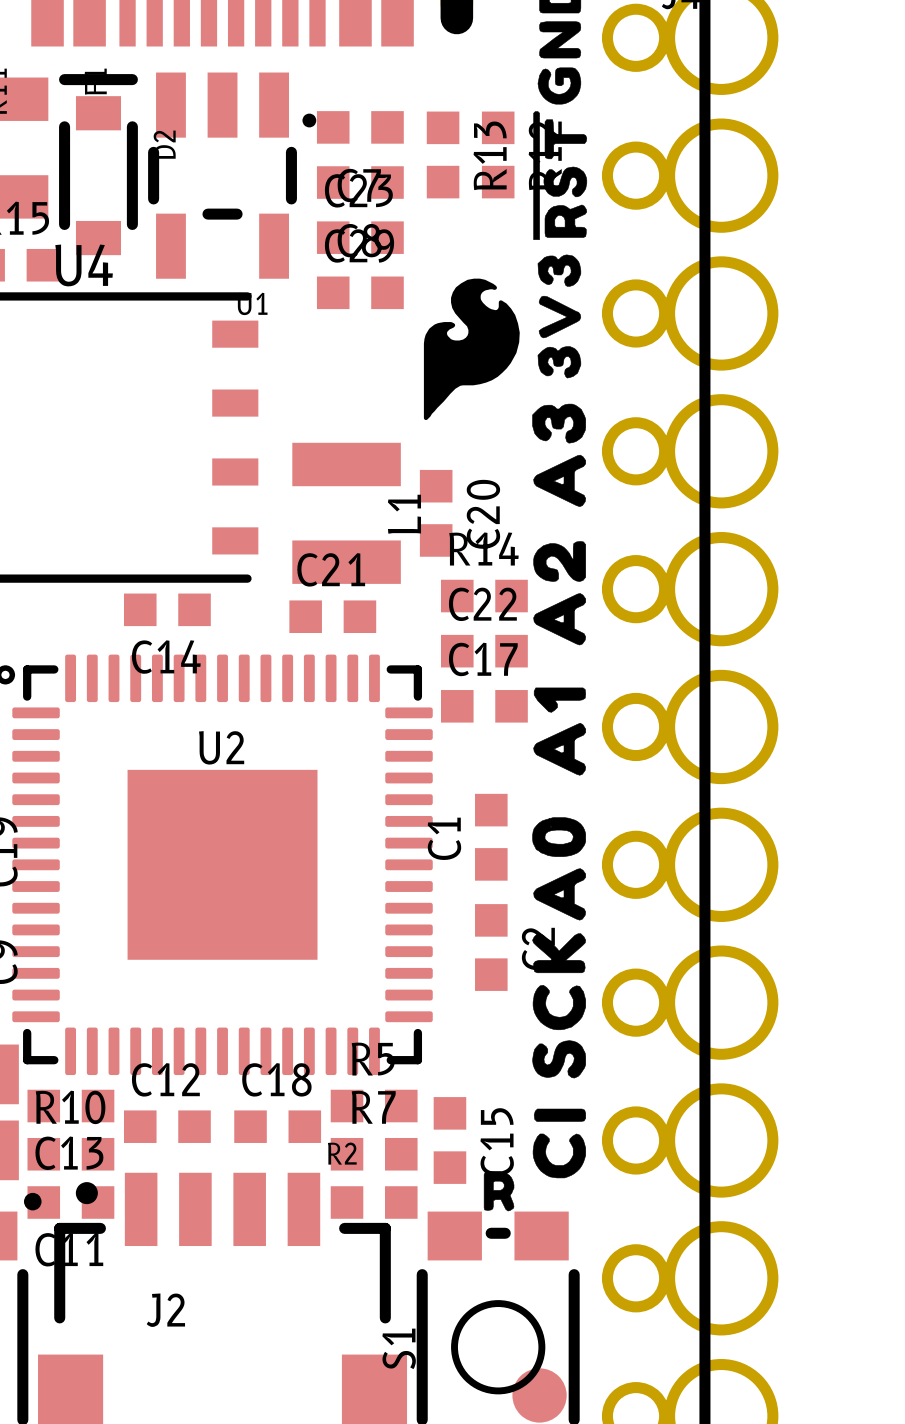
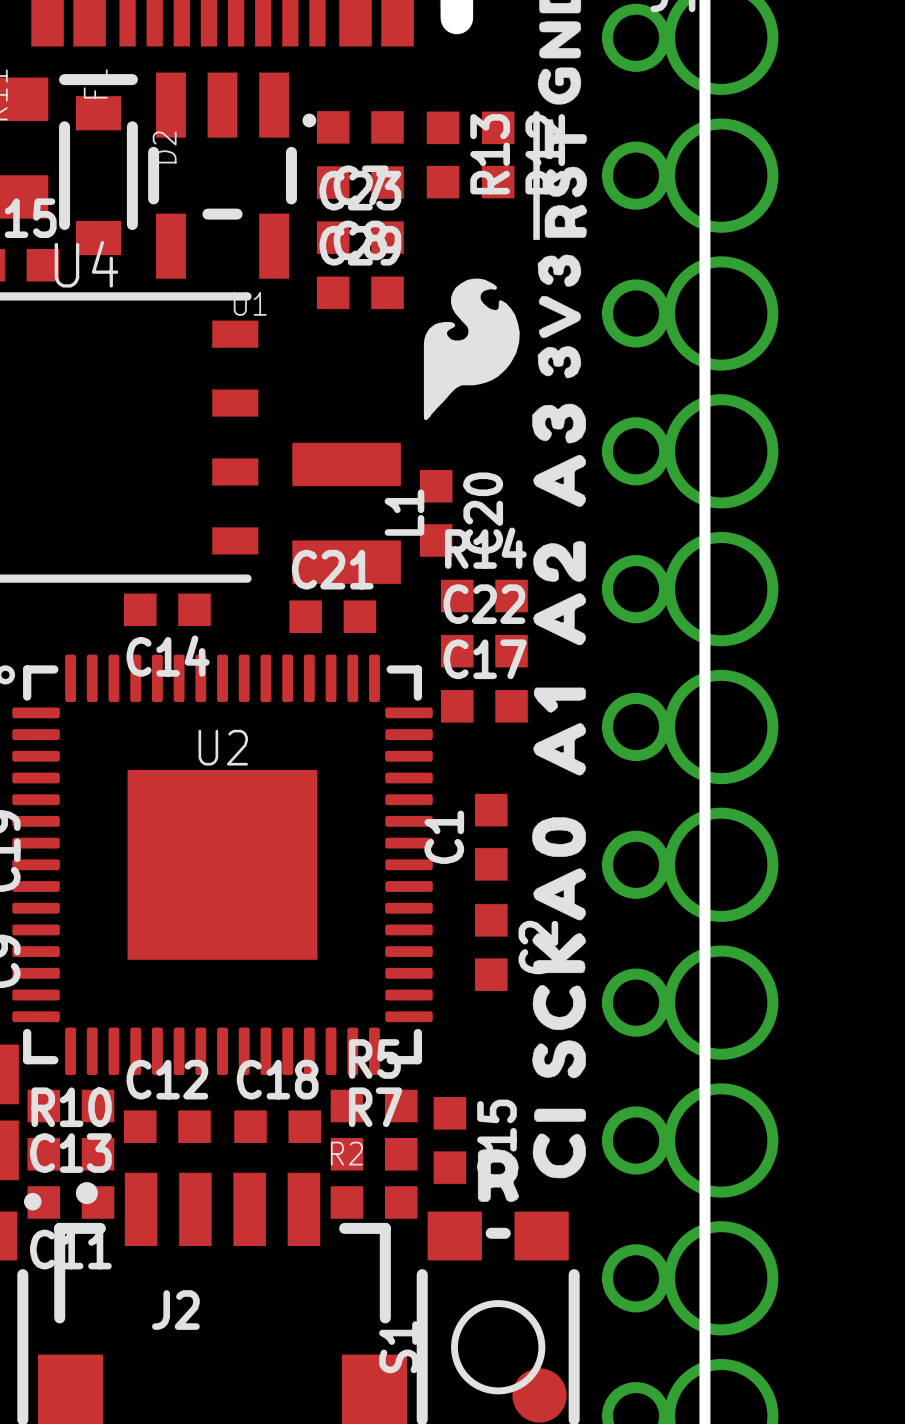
drawing shape: [483, 1171, 515, 1212] -> [477, 1149, 520, 1203]

